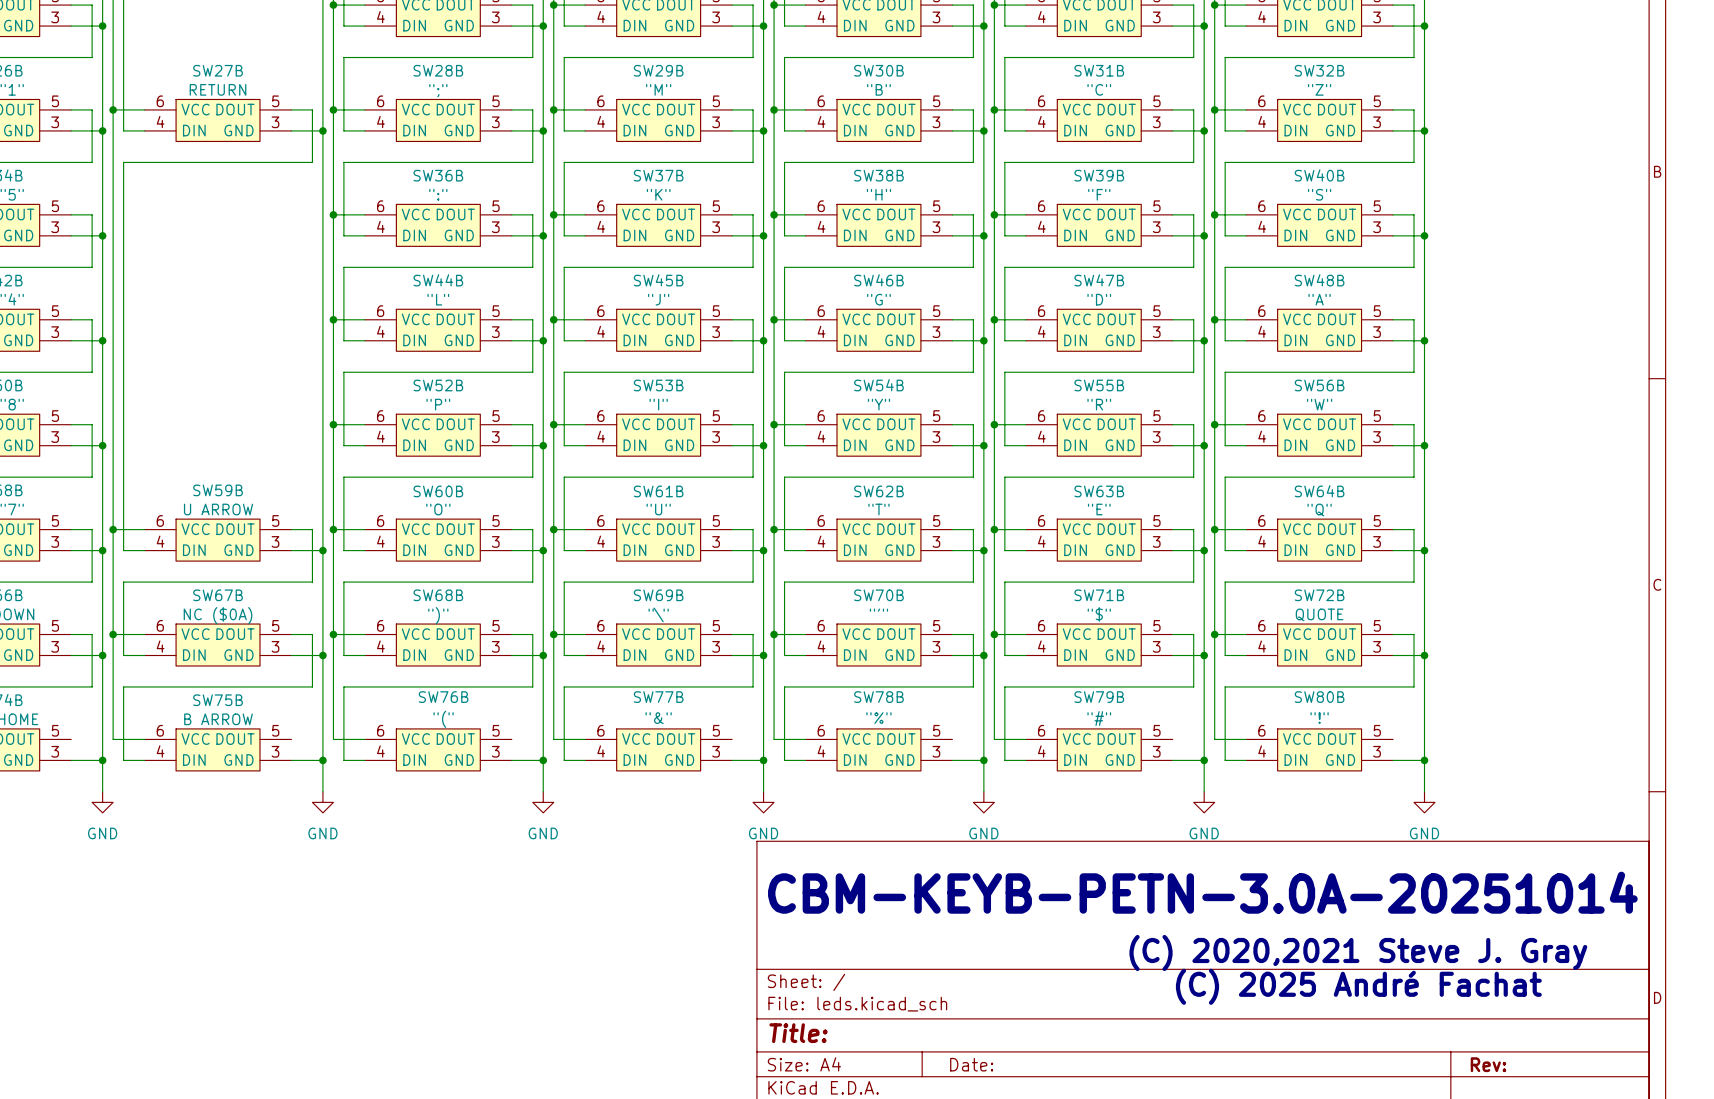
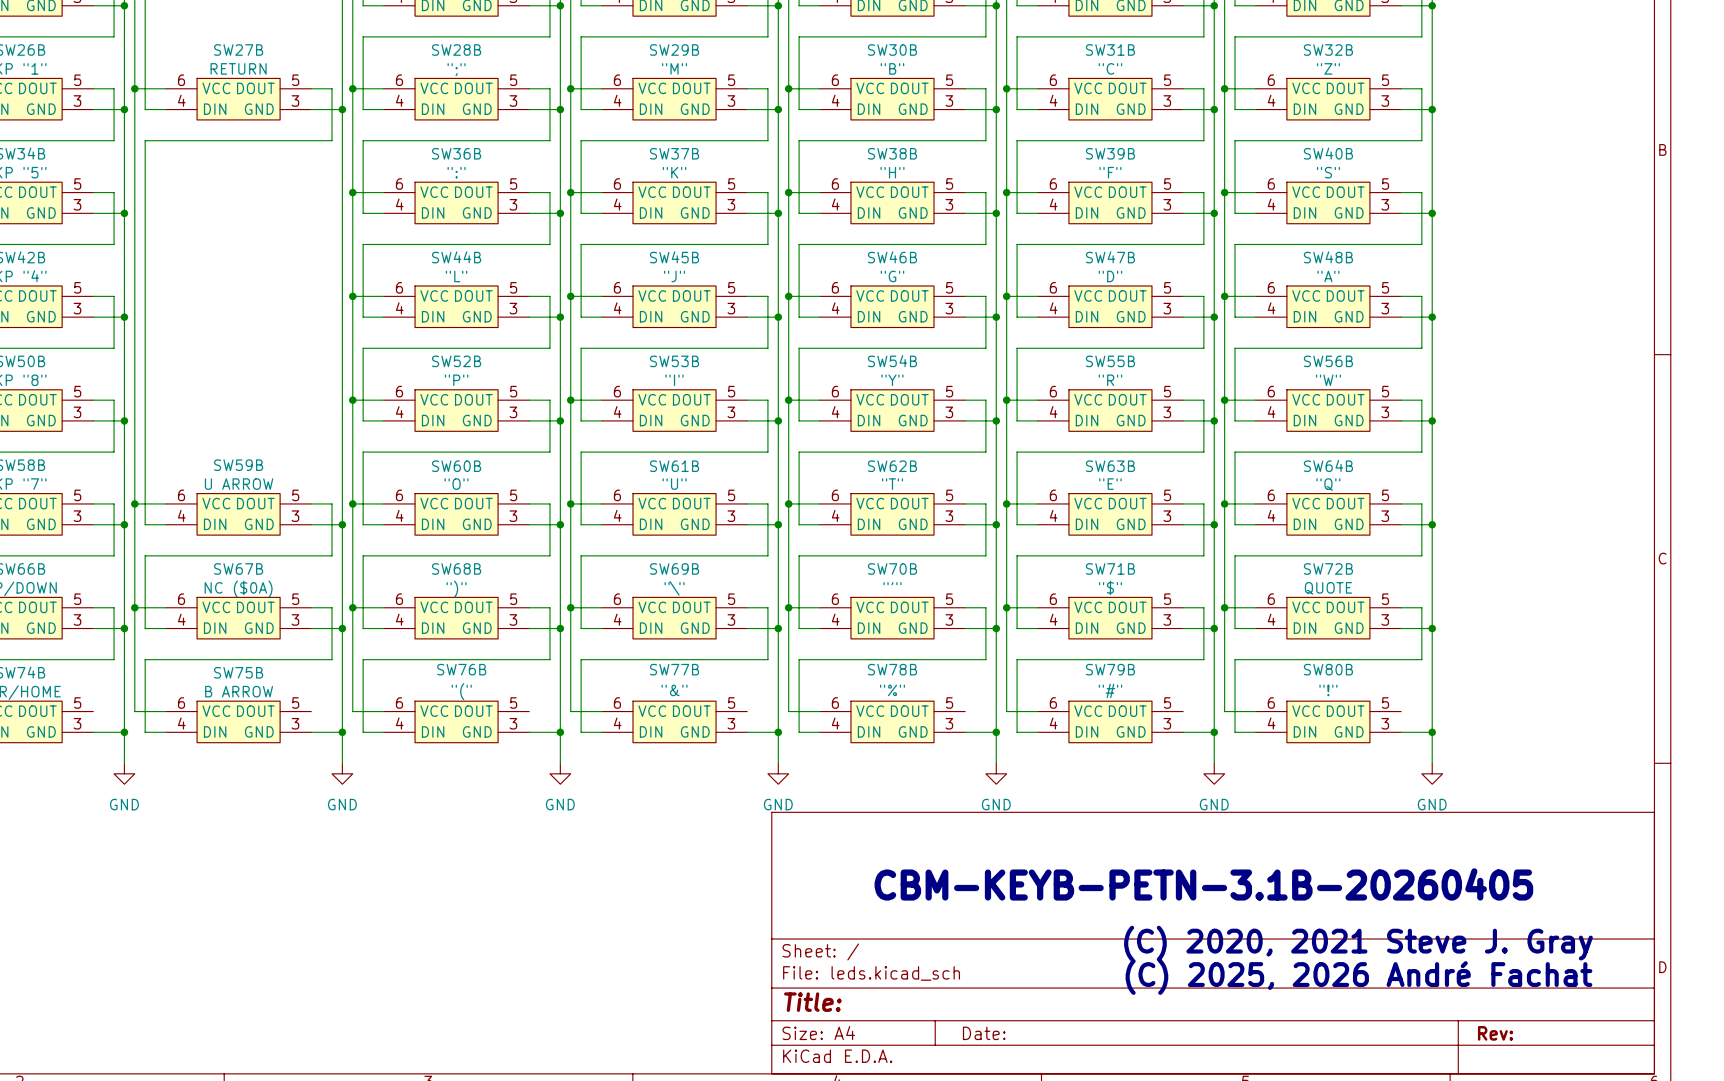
text: CBM-KEYB-PETN-3.0A-20251014 (1202, 892) -> CBM-KEYB-PETN-3.1B-20260405 (1203, 884)
text: (C) 2020,2021 Steve J. Gray (1358, 952) -> (C) 2020, 2021 Steve J. Gray (1358, 943)
text: (C) 2025 André Fachat (1358, 986) -> (C) 2025, 2026 André Fachat (1358, 977)

